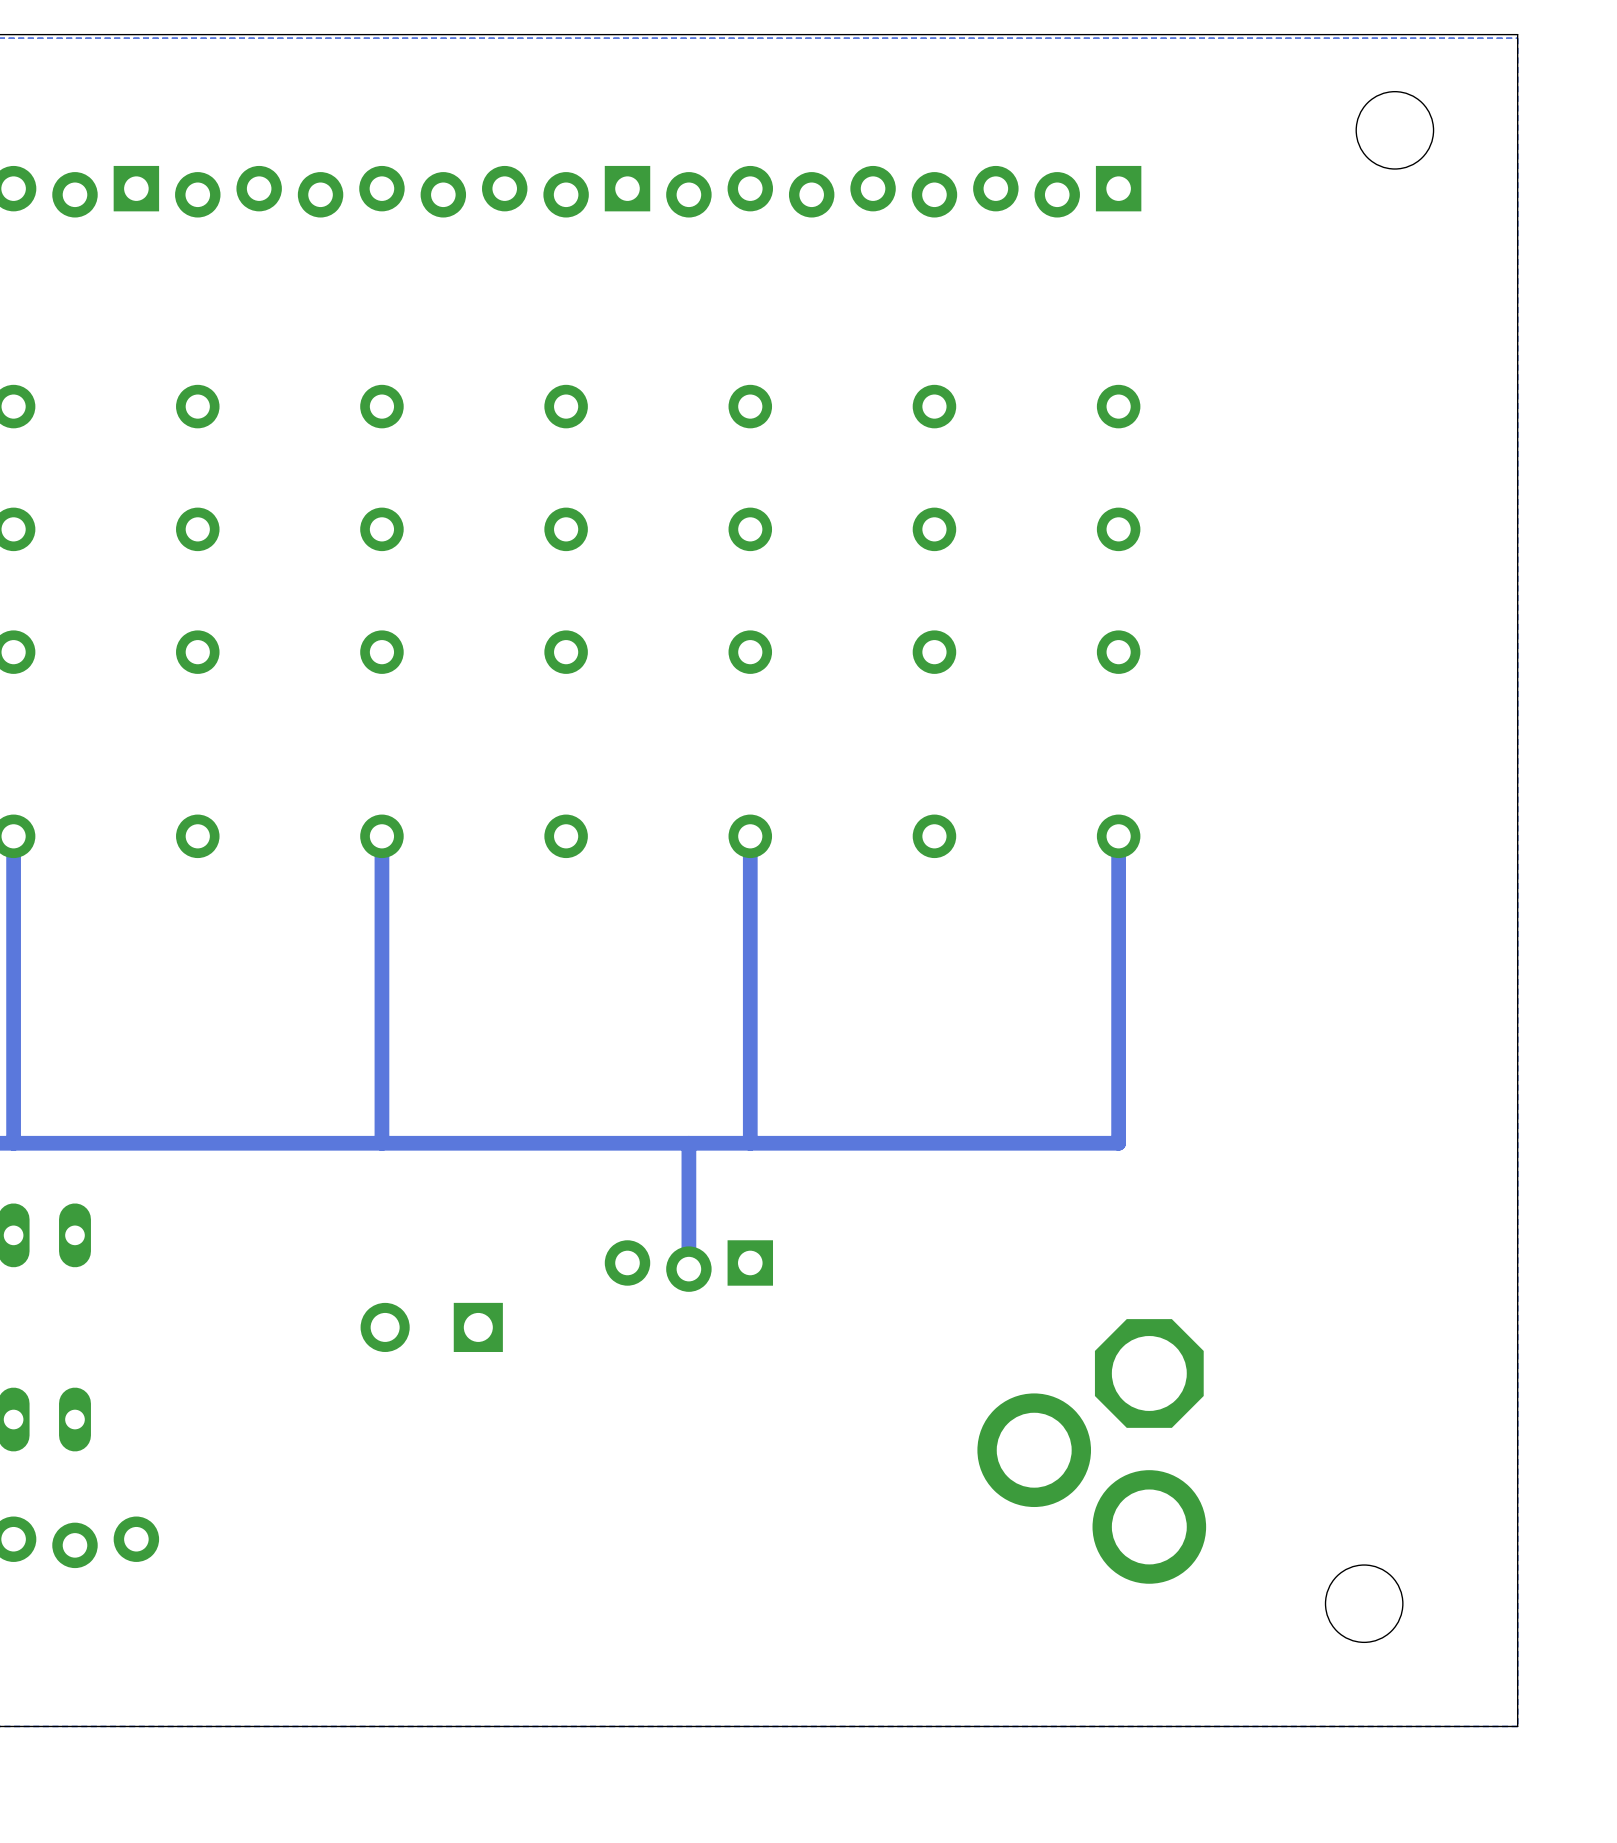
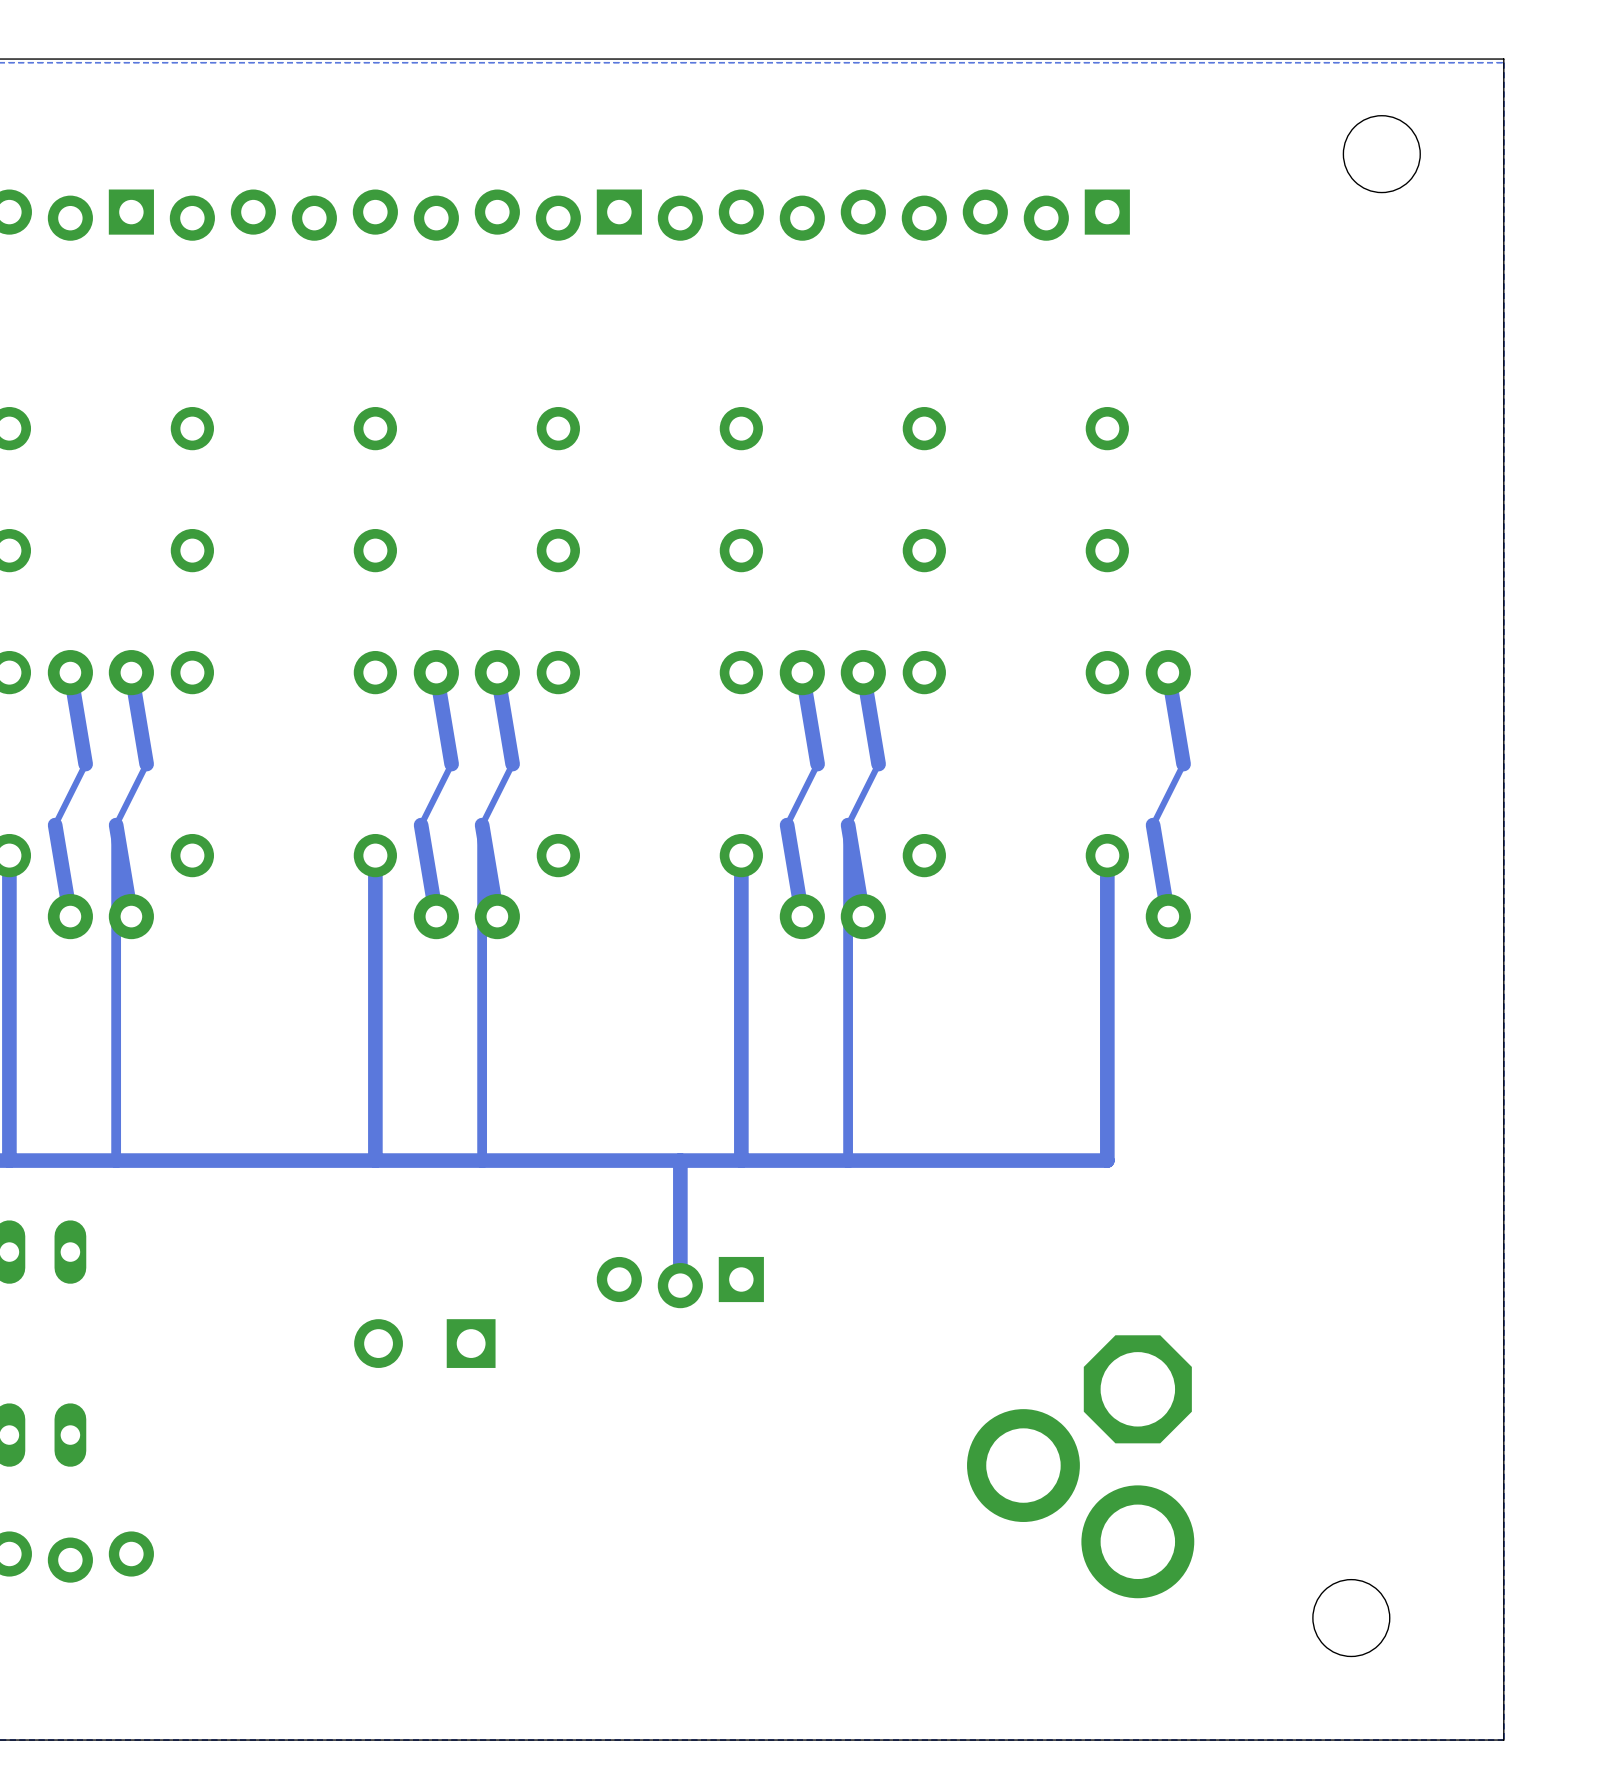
part: none -> (70, 794)
part: none -> (131, 794)
part: none -> (436, 794)
part: none -> (497, 794)
part: none -> (802, 794)
part: none -> (863, 794)
part: none -> (1168, 794)
track: none -> (116, 825) (116, 1160)
track: none -> (482, 825) (482, 1160)
track: none -> (848, 825) (848, 1160)

